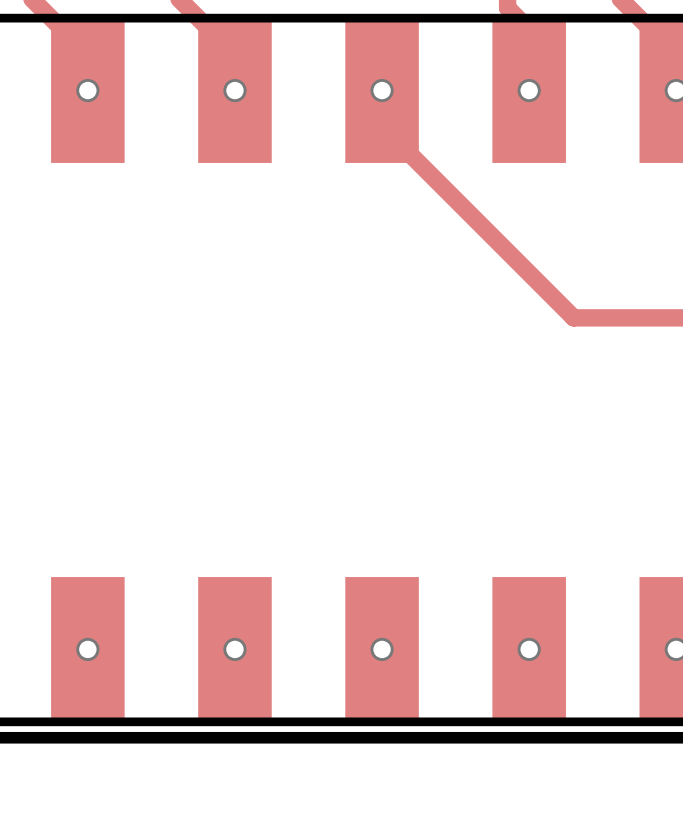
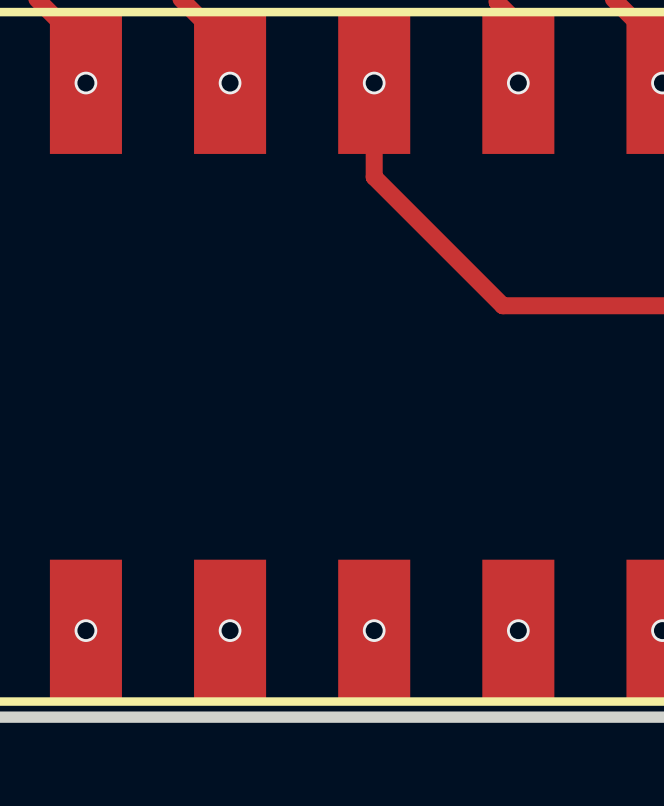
track: (382, 126) (573, 317) -> (374, 117) (374, 177) (502, 305) (562, 305)

